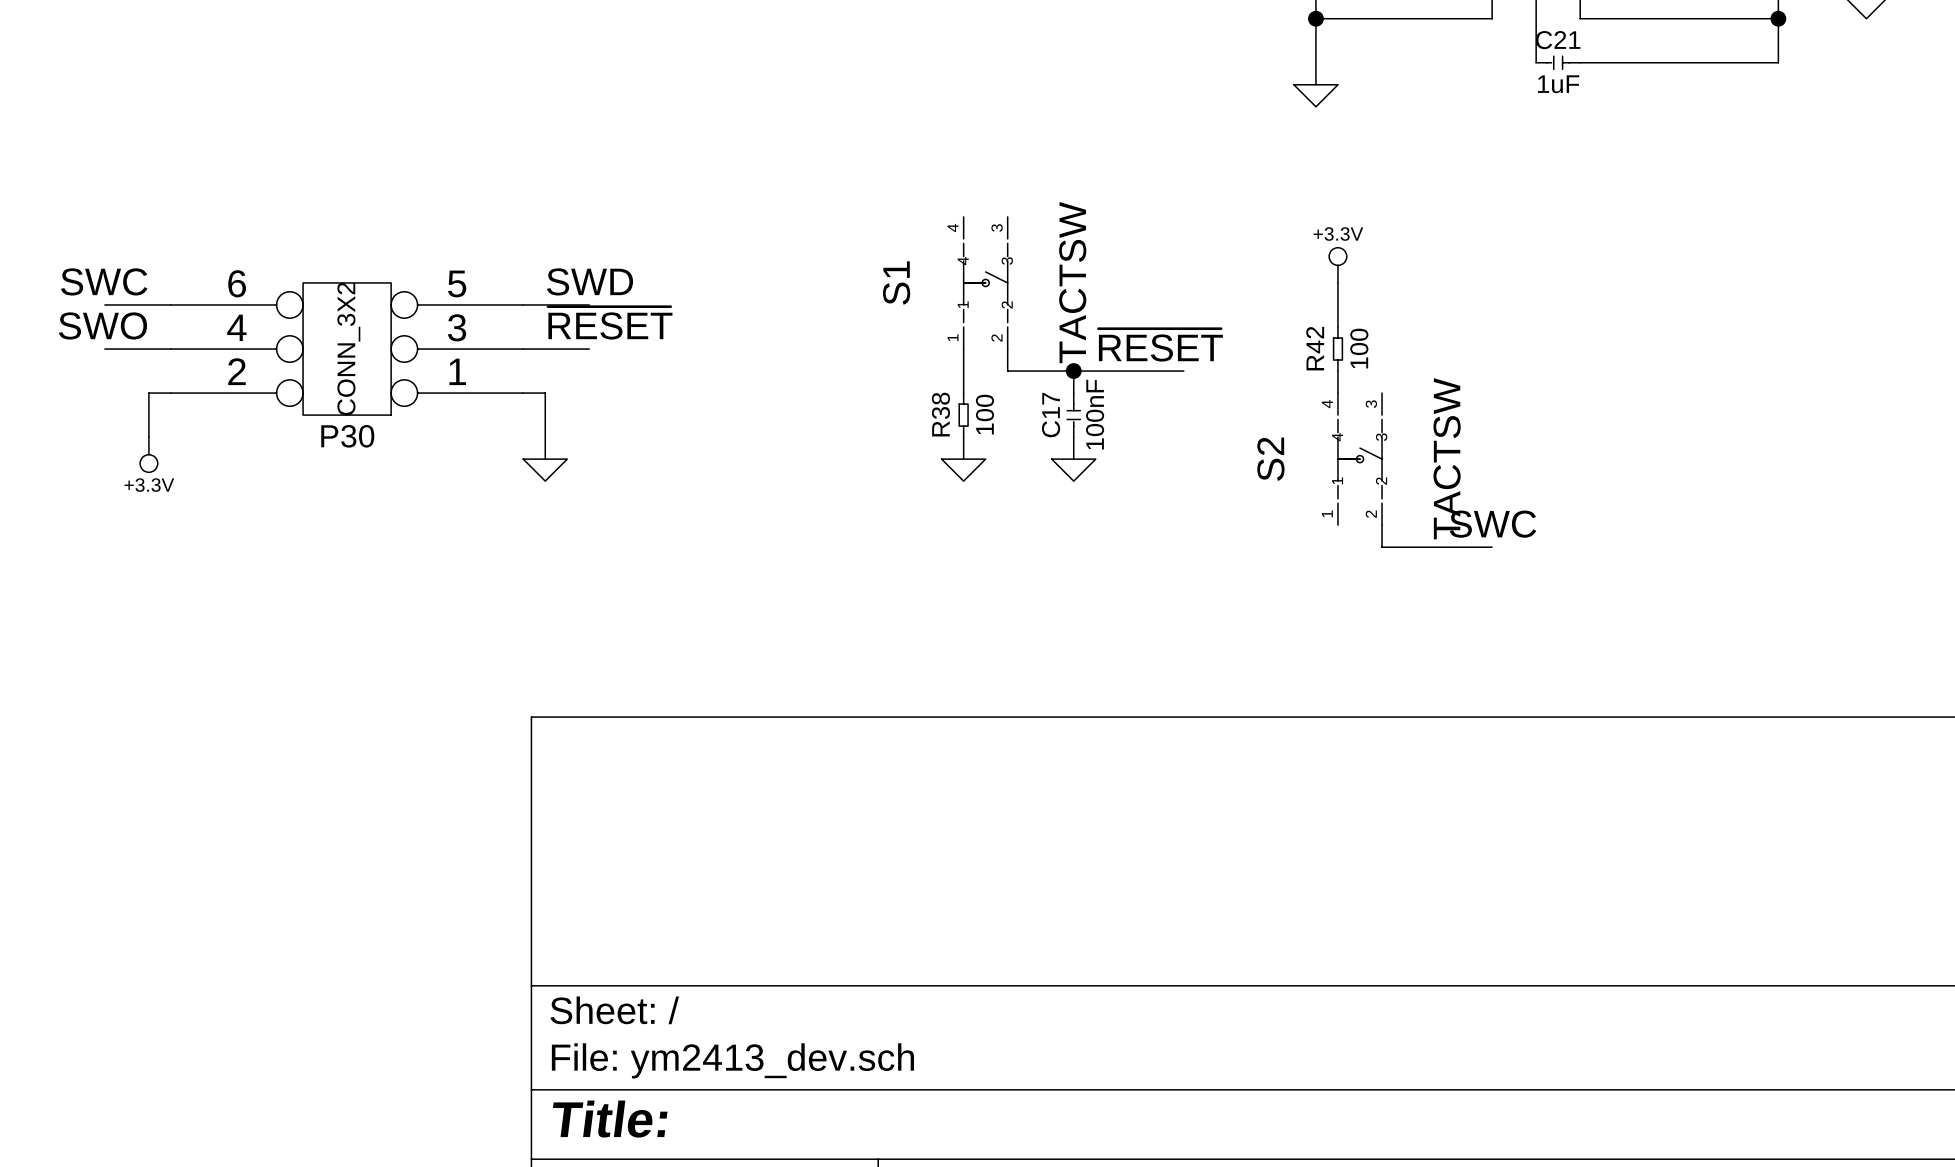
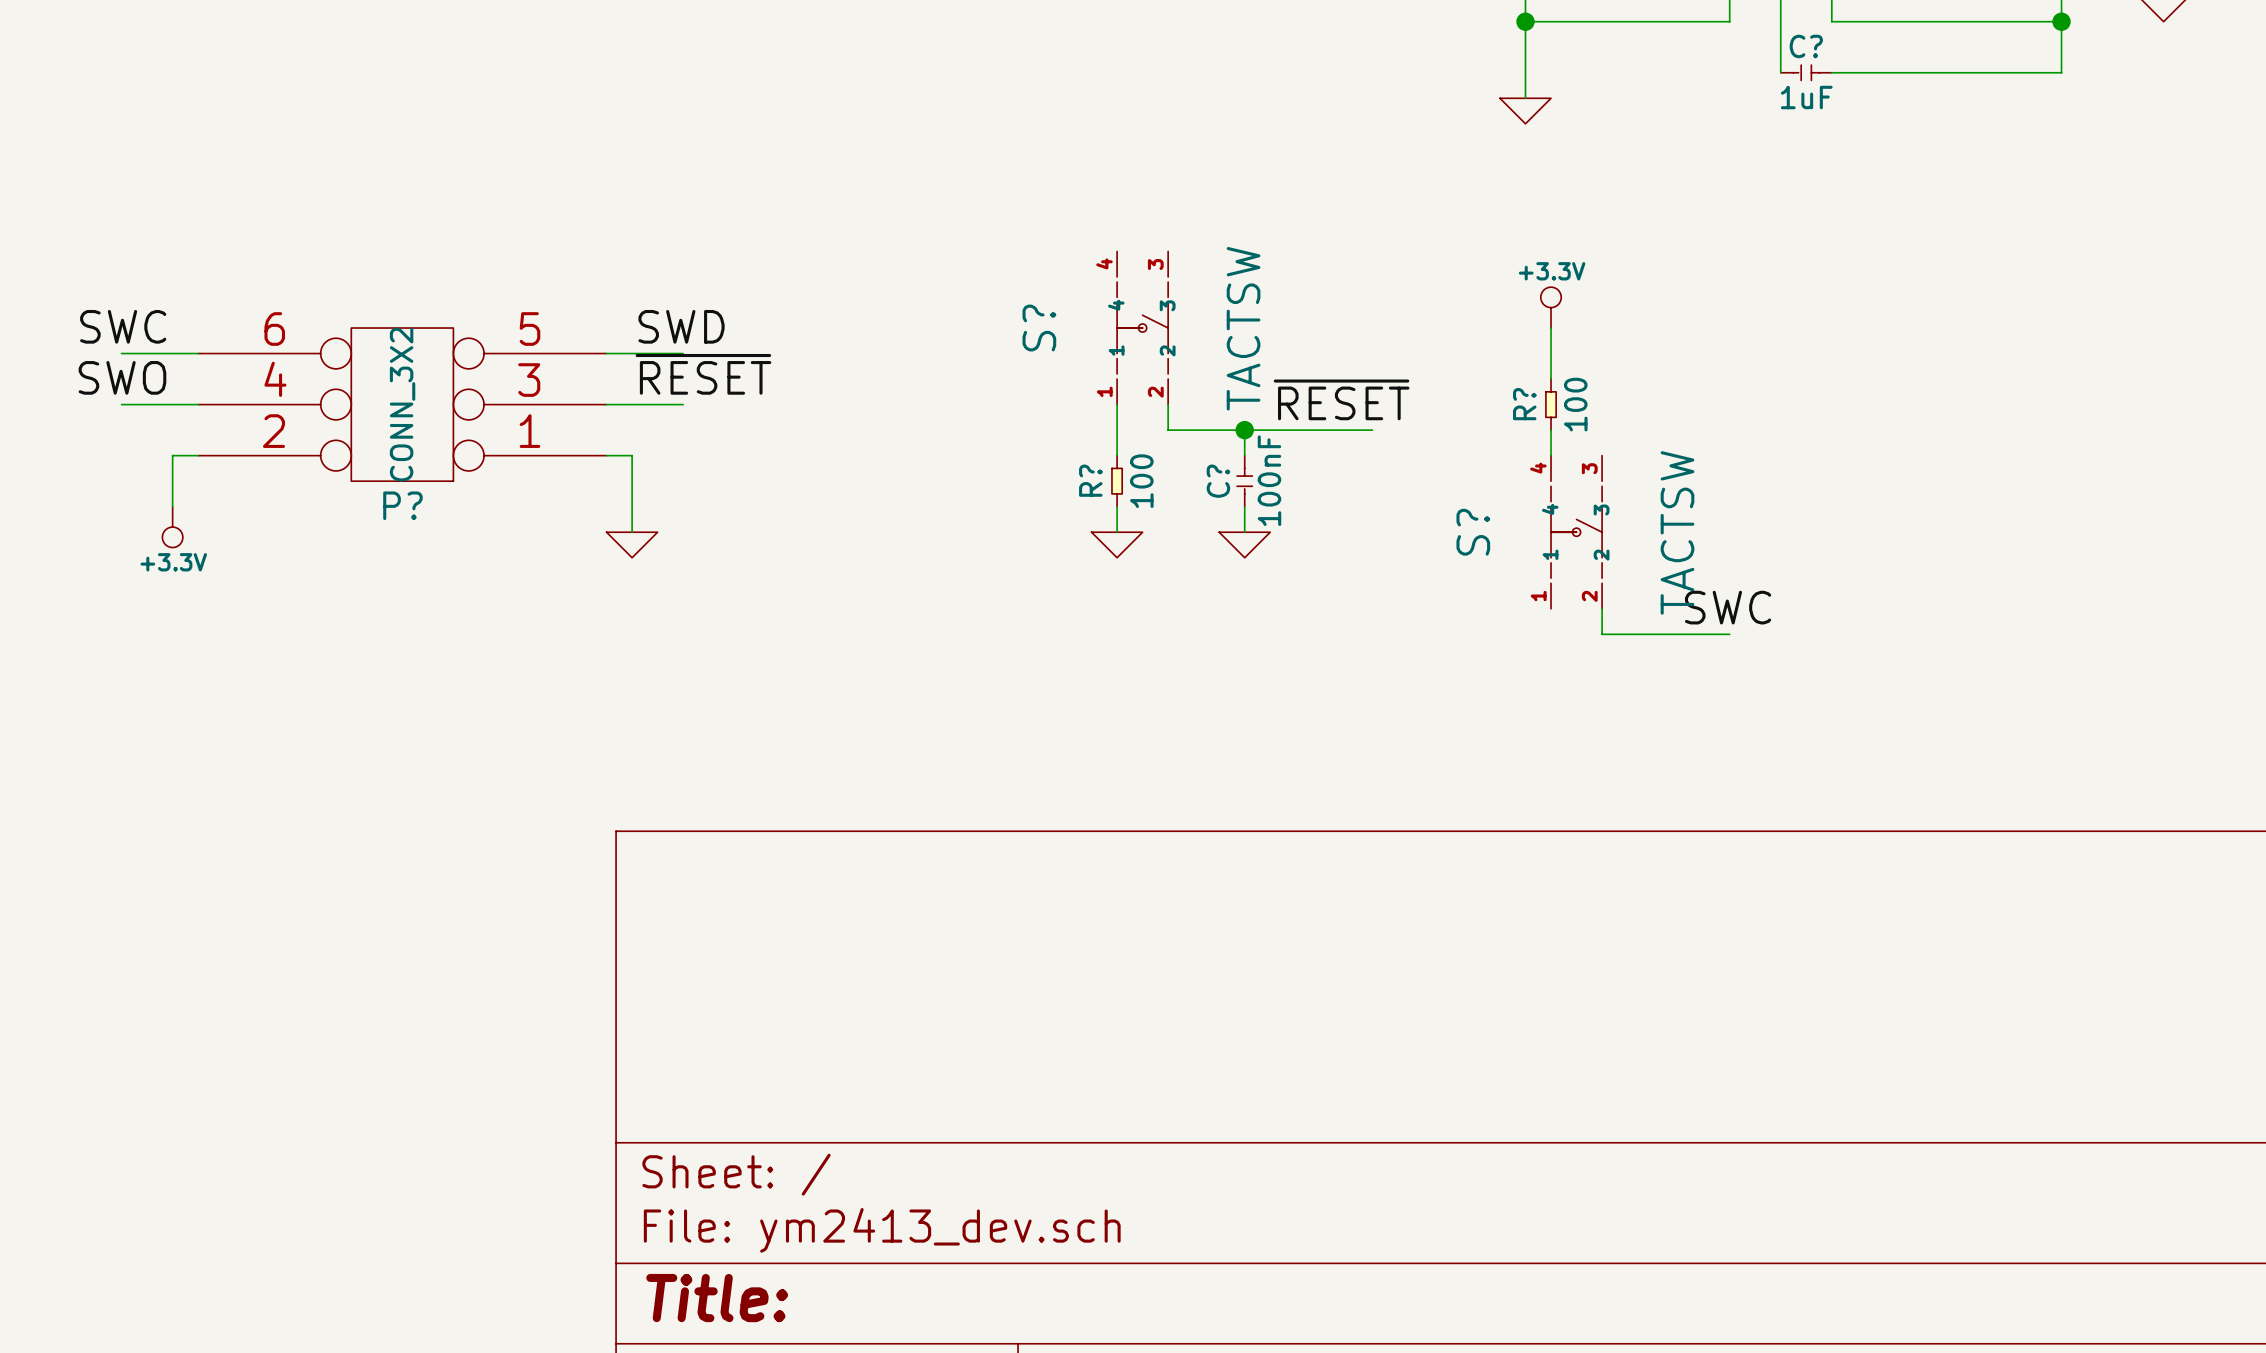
C21 name: C21 (1558, 40) -> C? (1806, 46)
S1 name: S1 (896, 283) -> S? (1039, 328)
R42 name: R42 (1315, 348) -> R? (1524, 404)
R38 name: R38 (940, 414) -> R? (1090, 480)
C17 name: C17 (1051, 415) -> C? (1218, 481)
P30 name: P30 (347, 436) -> P? (402, 505)
S2 name: S2 (1270, 459) -> S? (1473, 532)

